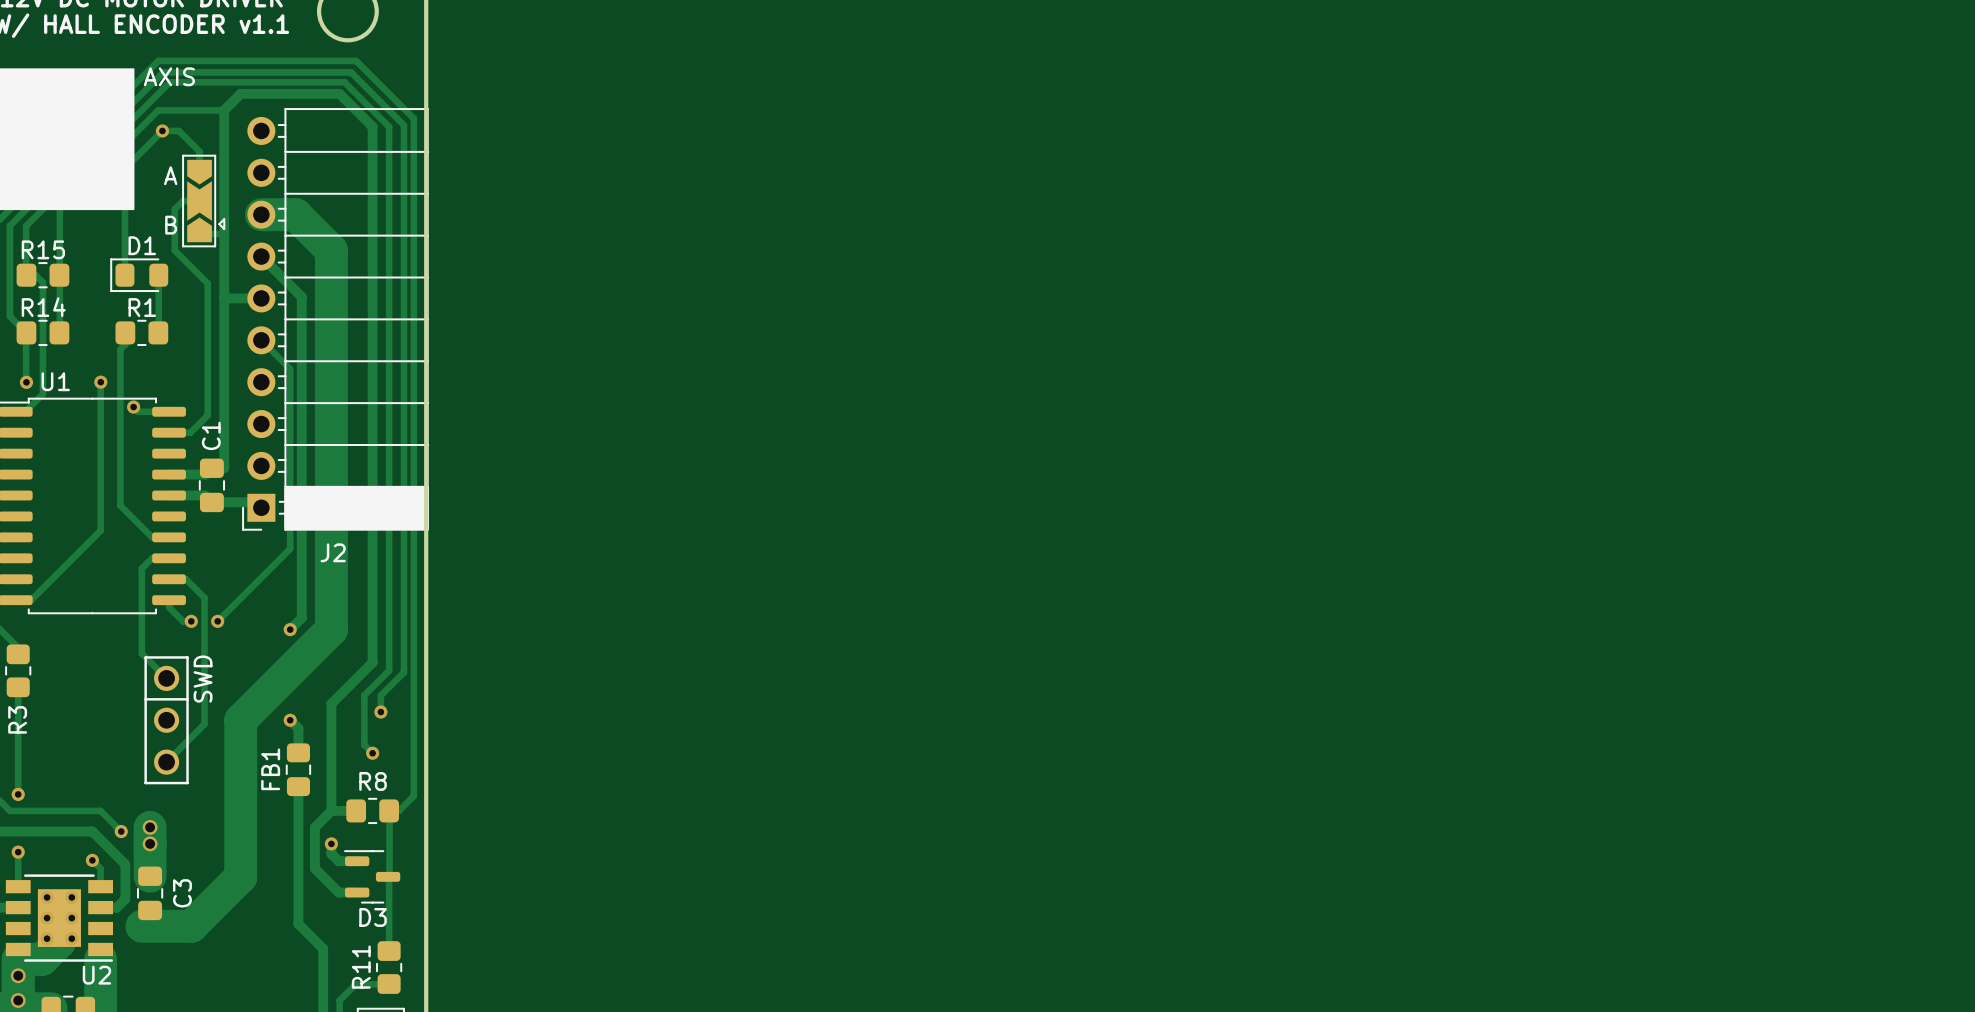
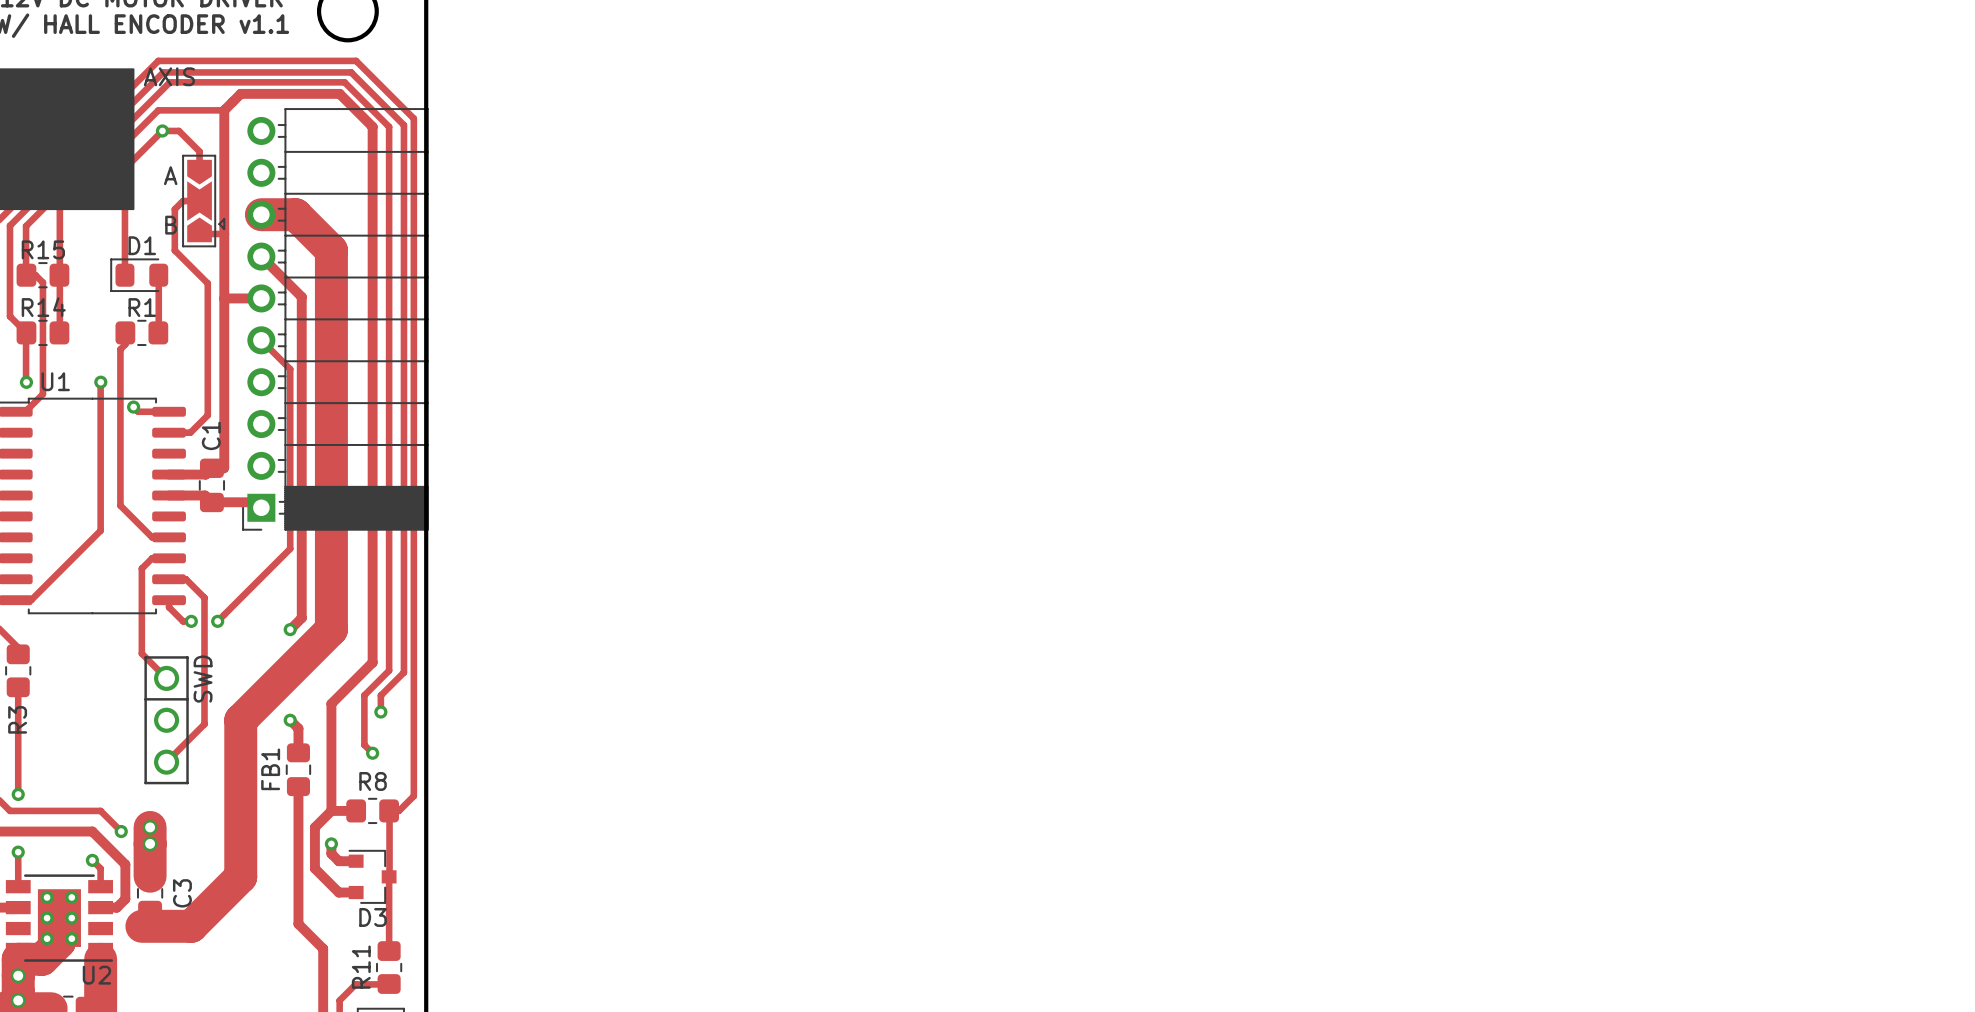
J2 name: J2 (333, 552) -> none
D3 footprint: [344, 850, 401, 904] -> [348, 849, 397, 904]

